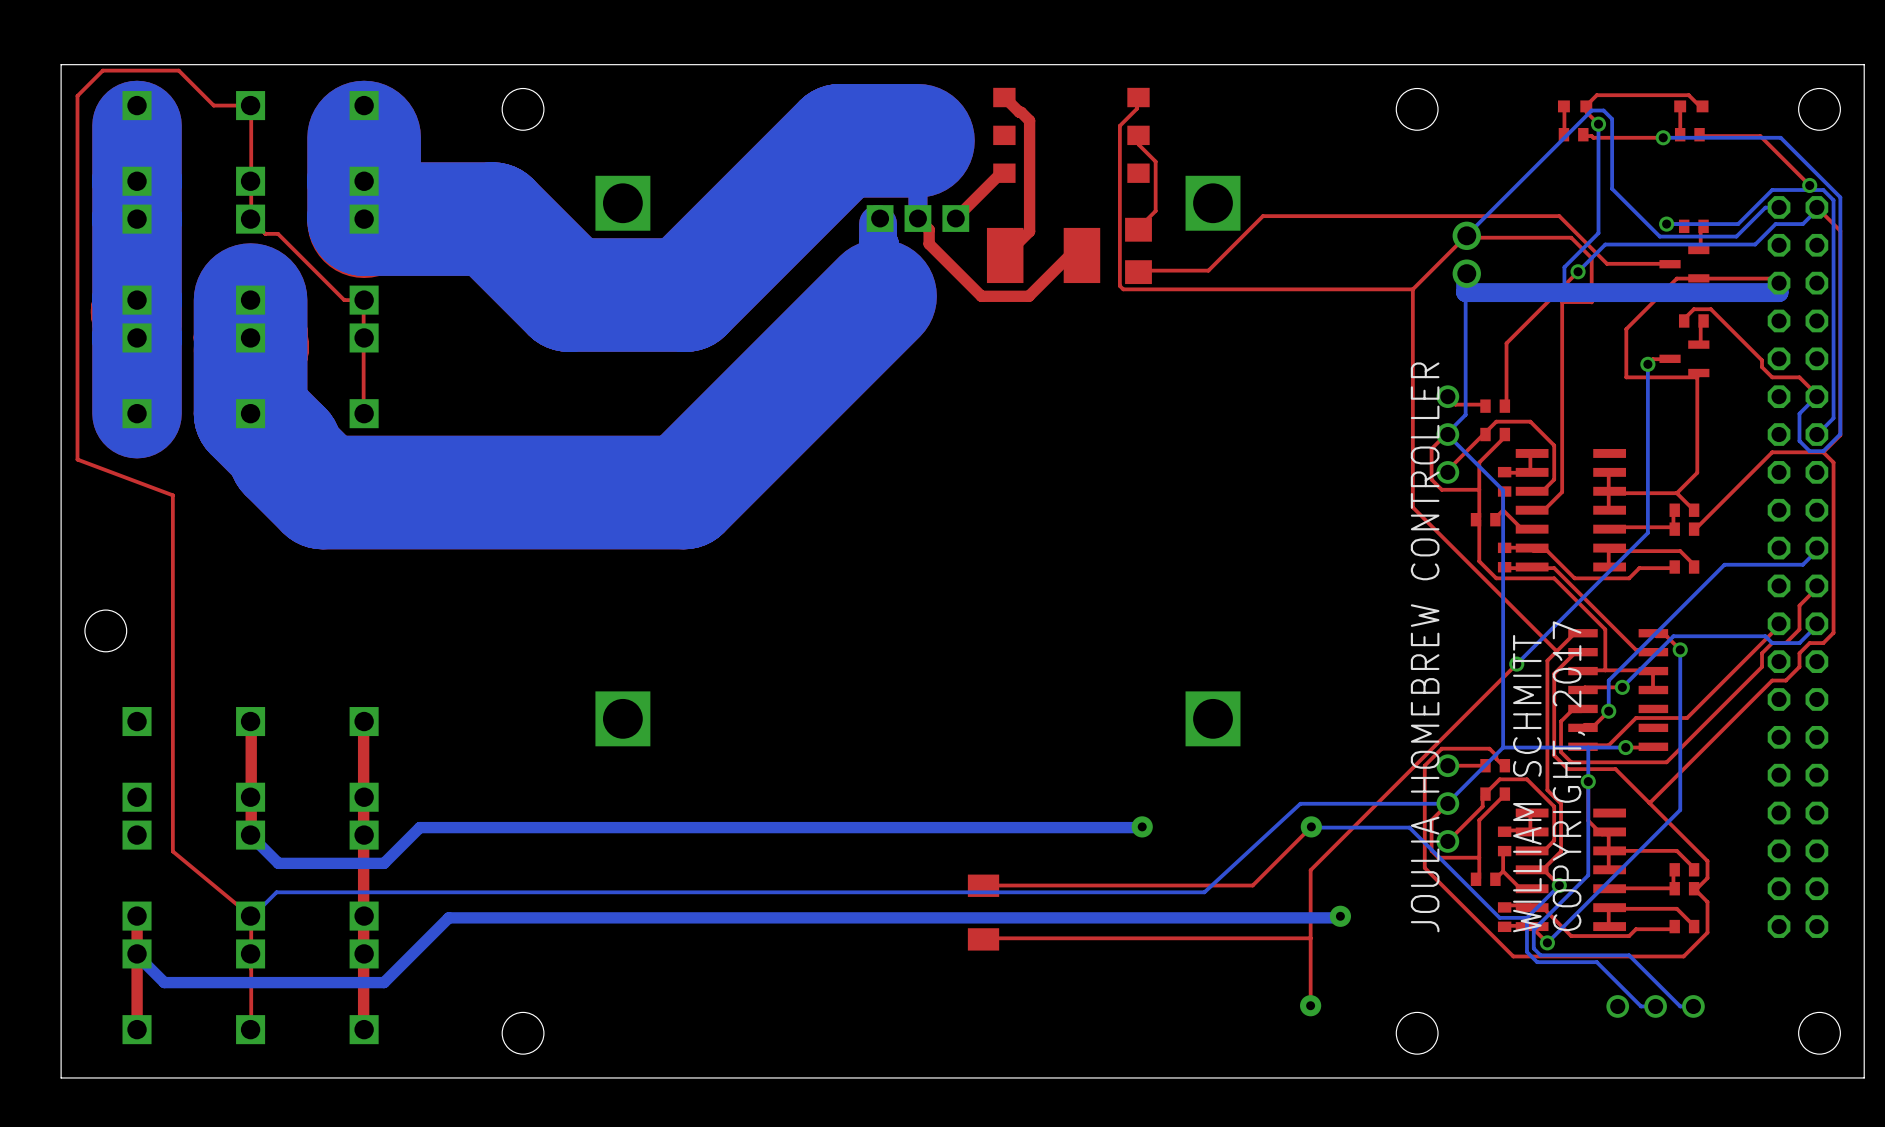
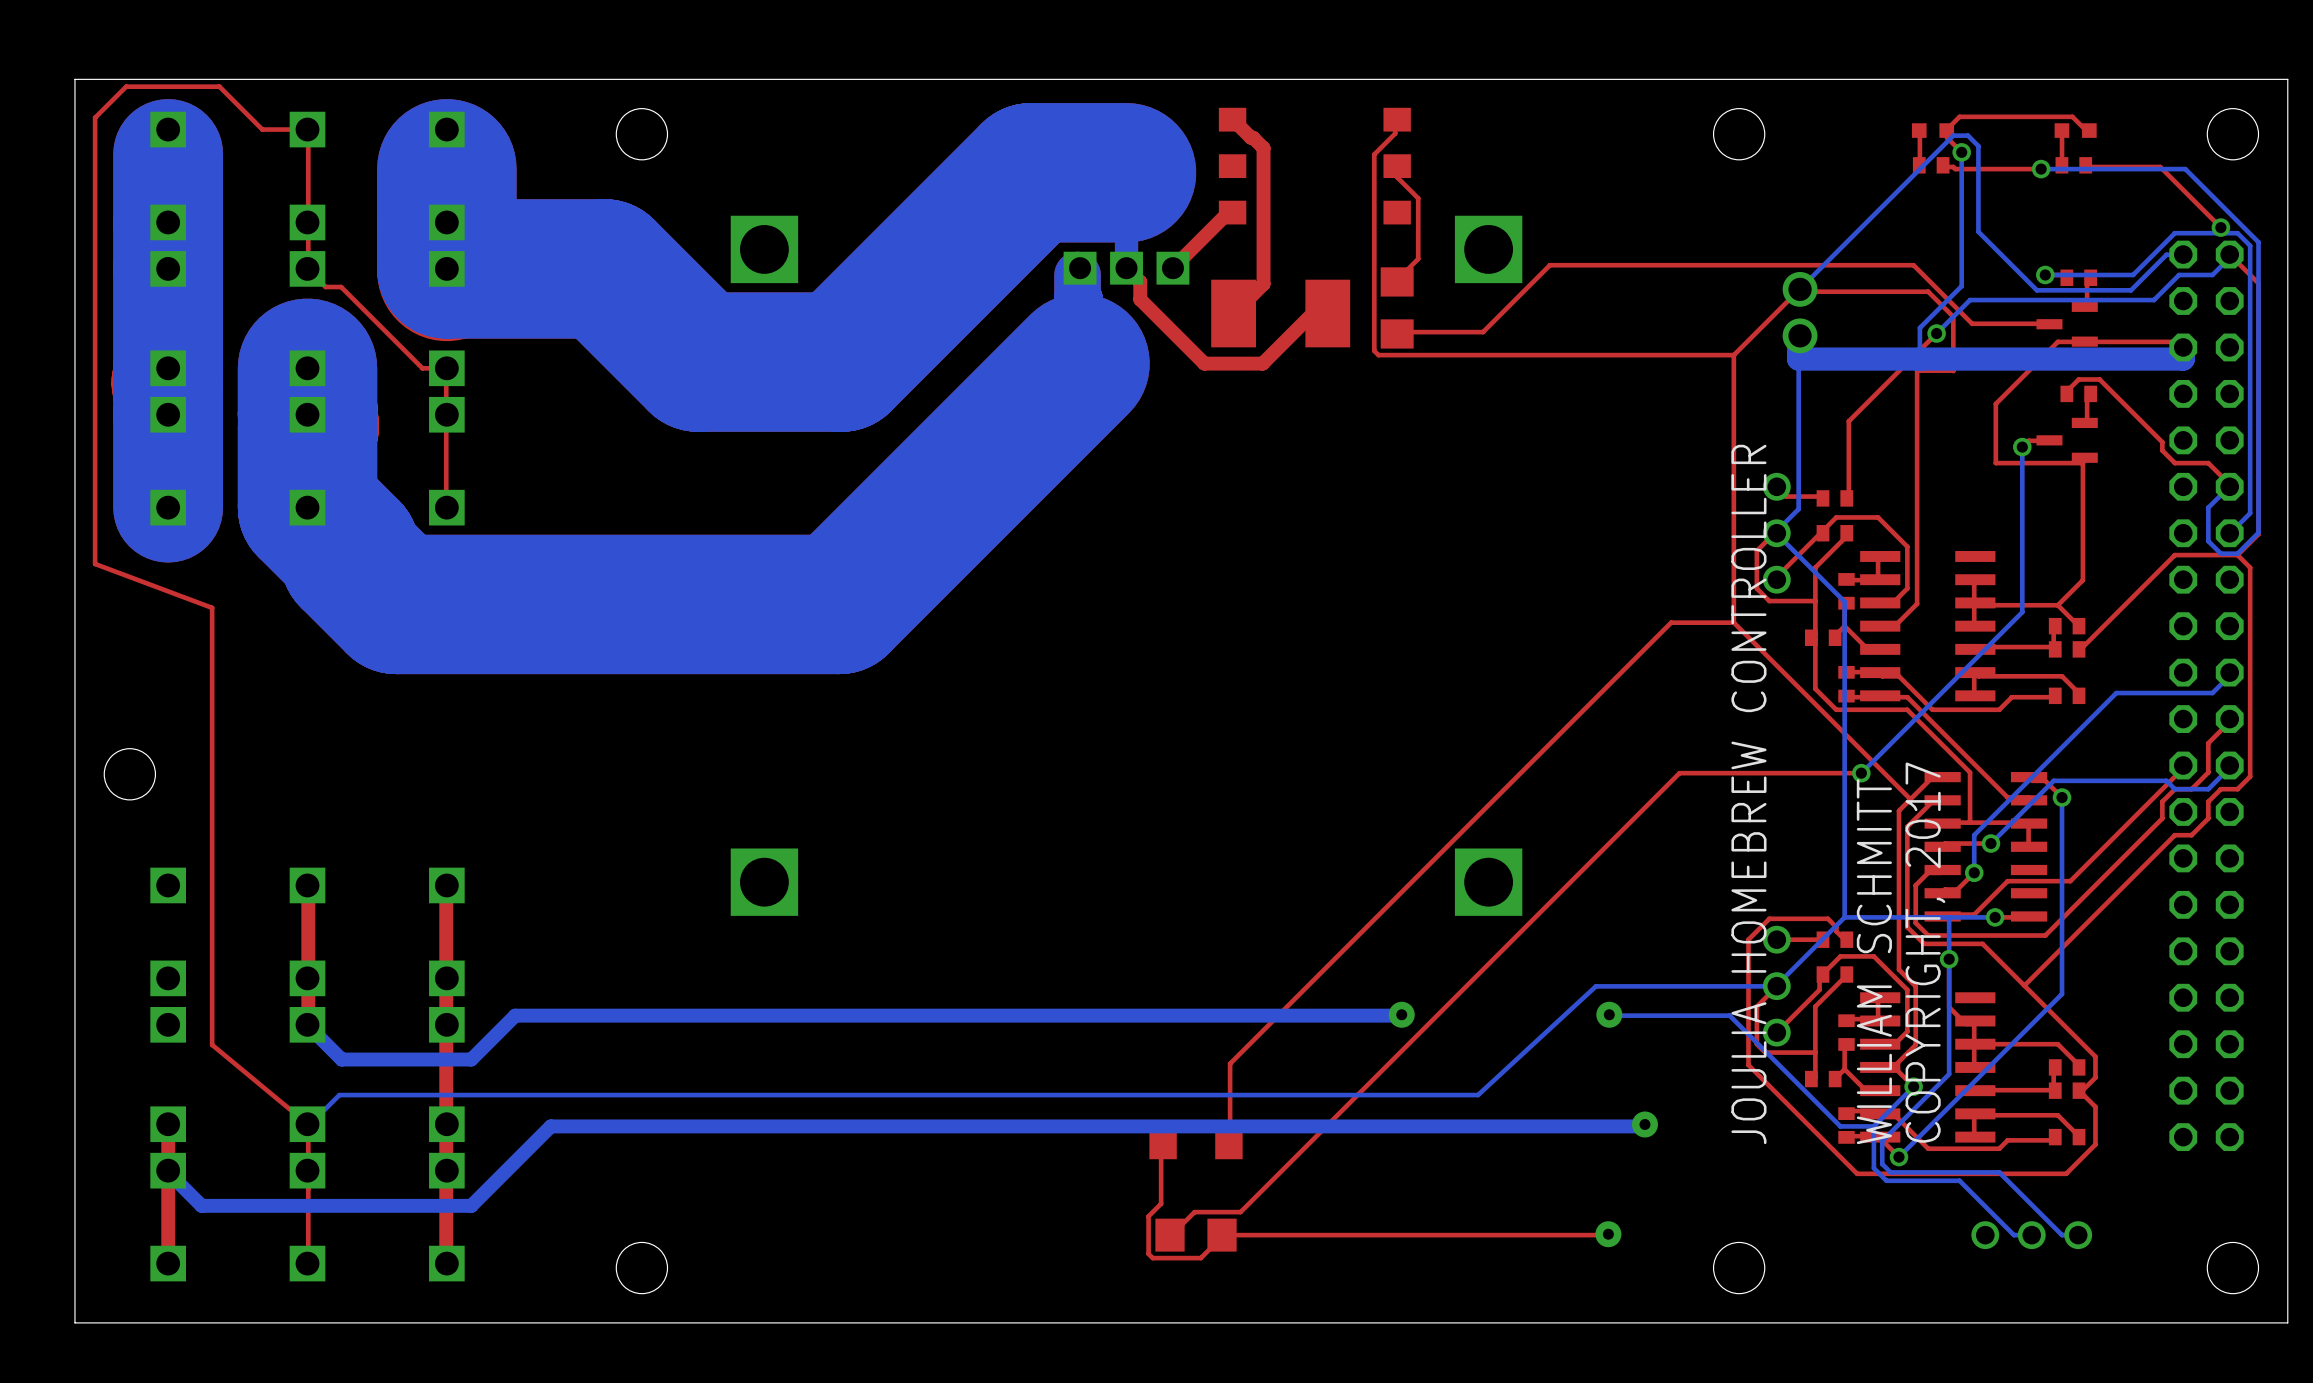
bottom track: (1647, 498) (1647, 532) (1516, 664) -> (2022, 612) (1861, 773)
top track: none -> (1733, 622) (1671, 622) (1230, 1063) (1228, 1140)
top track: none -> (1861, 773) (1679, 773) (1240, 1212) (1194, 1212) (1170, 1235)
top track: (1516, 664) (1310, 870) (1310, 1005) -> (1163, 1140) (1161, 1141) (1161, 1203) (1148, 1216) (1148, 1253) (1152, 1258) (1200, 1258) (1222, 1235) (1608, 1234)
via position: (1516, 664) -> (1861, 773)
top track: (1311, 826) (1252, 885) (983, 885) -> none
part rotation: 0° (983, 912) -> 90° clockwise (1196, 1140)
top track: (1310, 938) (983, 939) -> none
part: none -> (1196, 1235)

